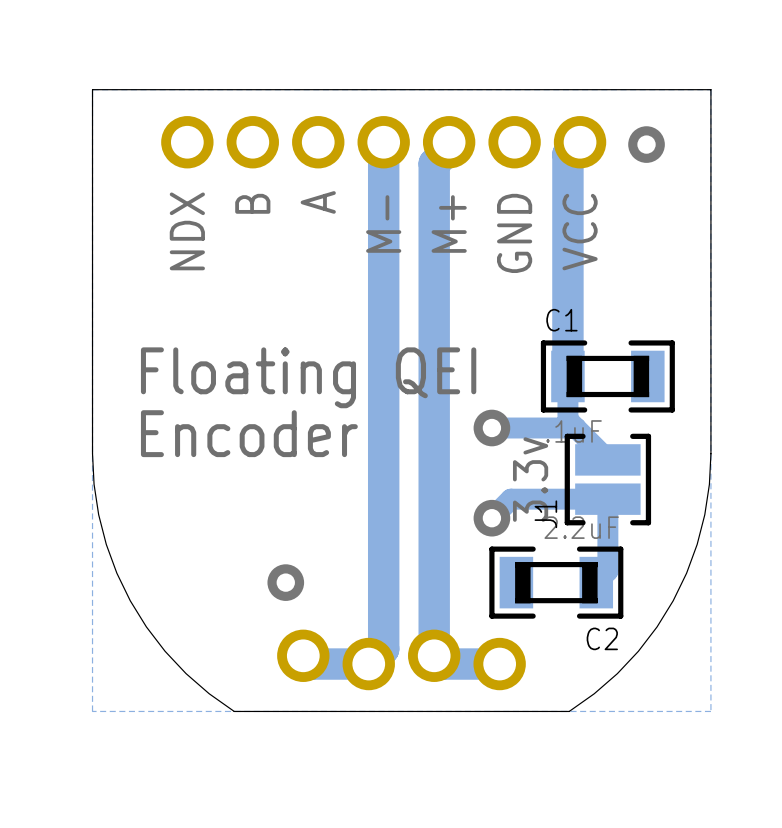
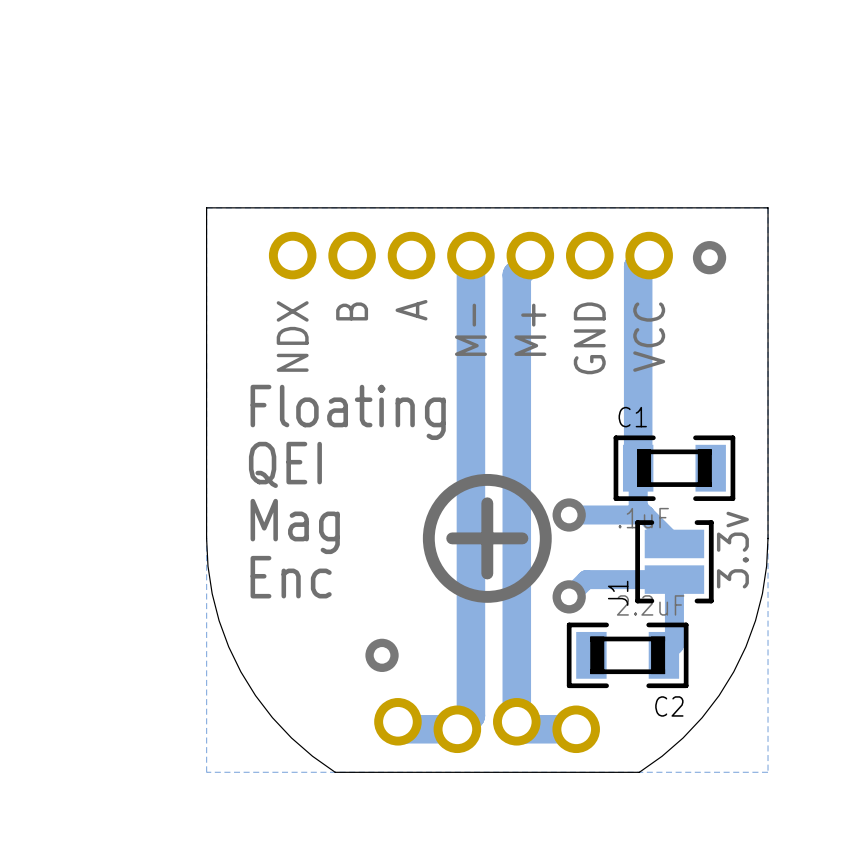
text: none -> Floating (348, 412)
text: Floating QEI (308, 377) -> QEI (285, 464)
drawing: none -> [422, 473, 552, 603]
line: none -> (487, 503) (487, 573)
text: Encoder (249, 433) -> Mag (295, 526)
line: none -> (522, 538) (452, 538)
text position: 3.3v (530, 479) -> 3.3v (732, 550)
text: none -> Enc (291, 577)

